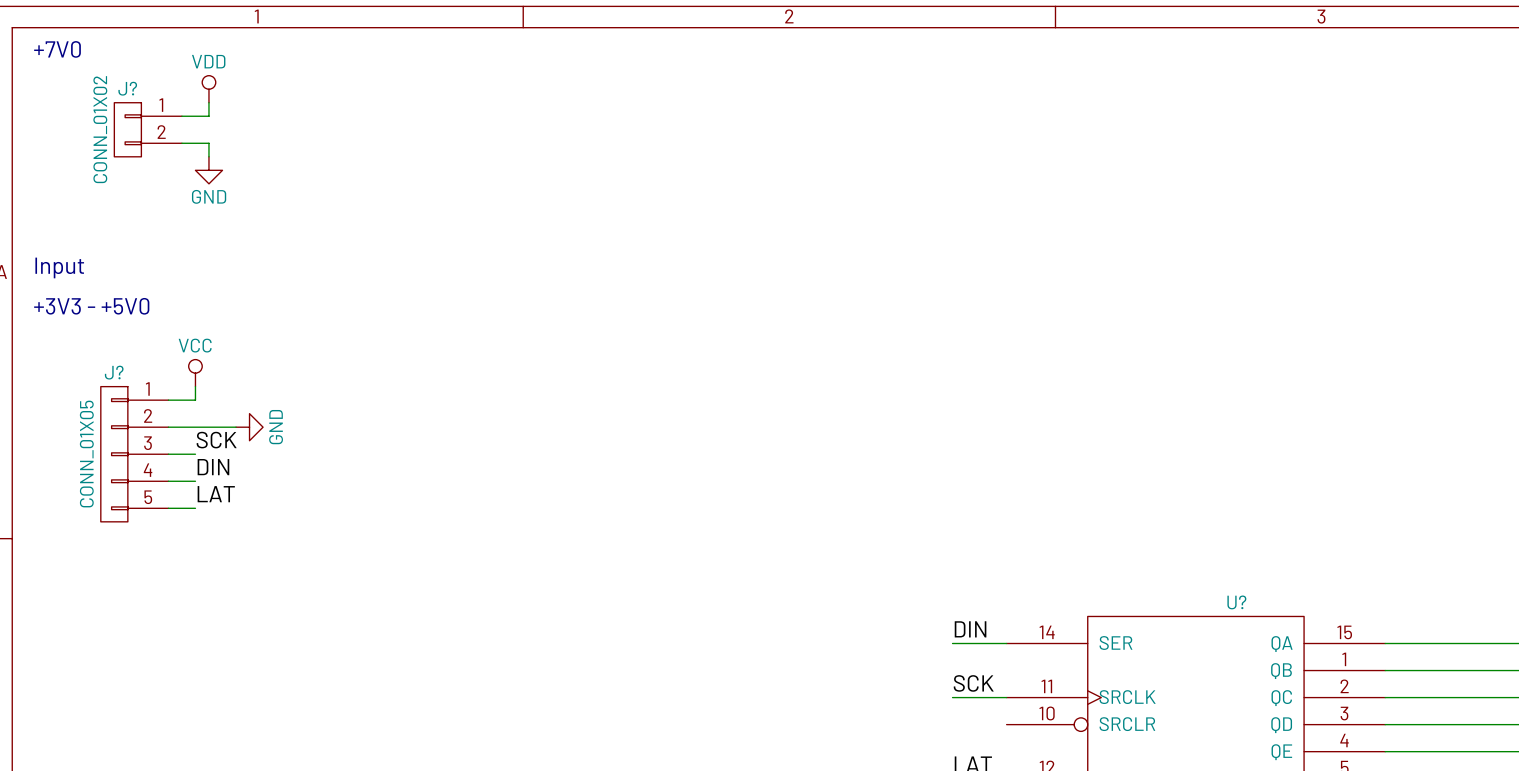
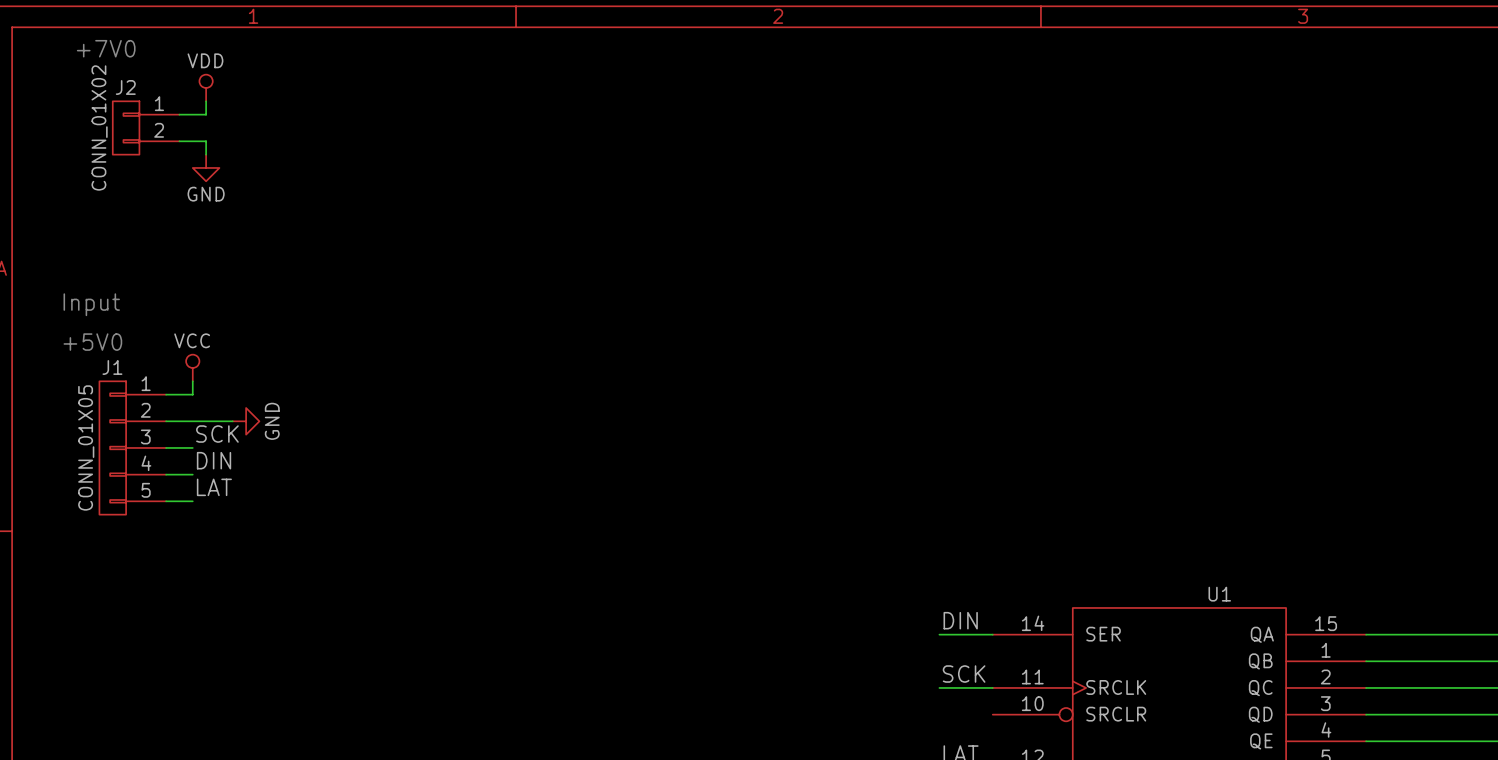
text position: +7V0 (57, 49) -> +7V0 (106, 48)
J? name: J? (127, 88) -> J2 (125, 87)
text position: Input (59, 267) -> Input (91, 304)
text: +3V3 - +5V0 (91, 306) -> none
text: none -> +5V0 (92, 342)
J? name: J? (114, 372) -> J1 (112, 367)
U? name: U? (1236, 602) -> U1 (1219, 594)

